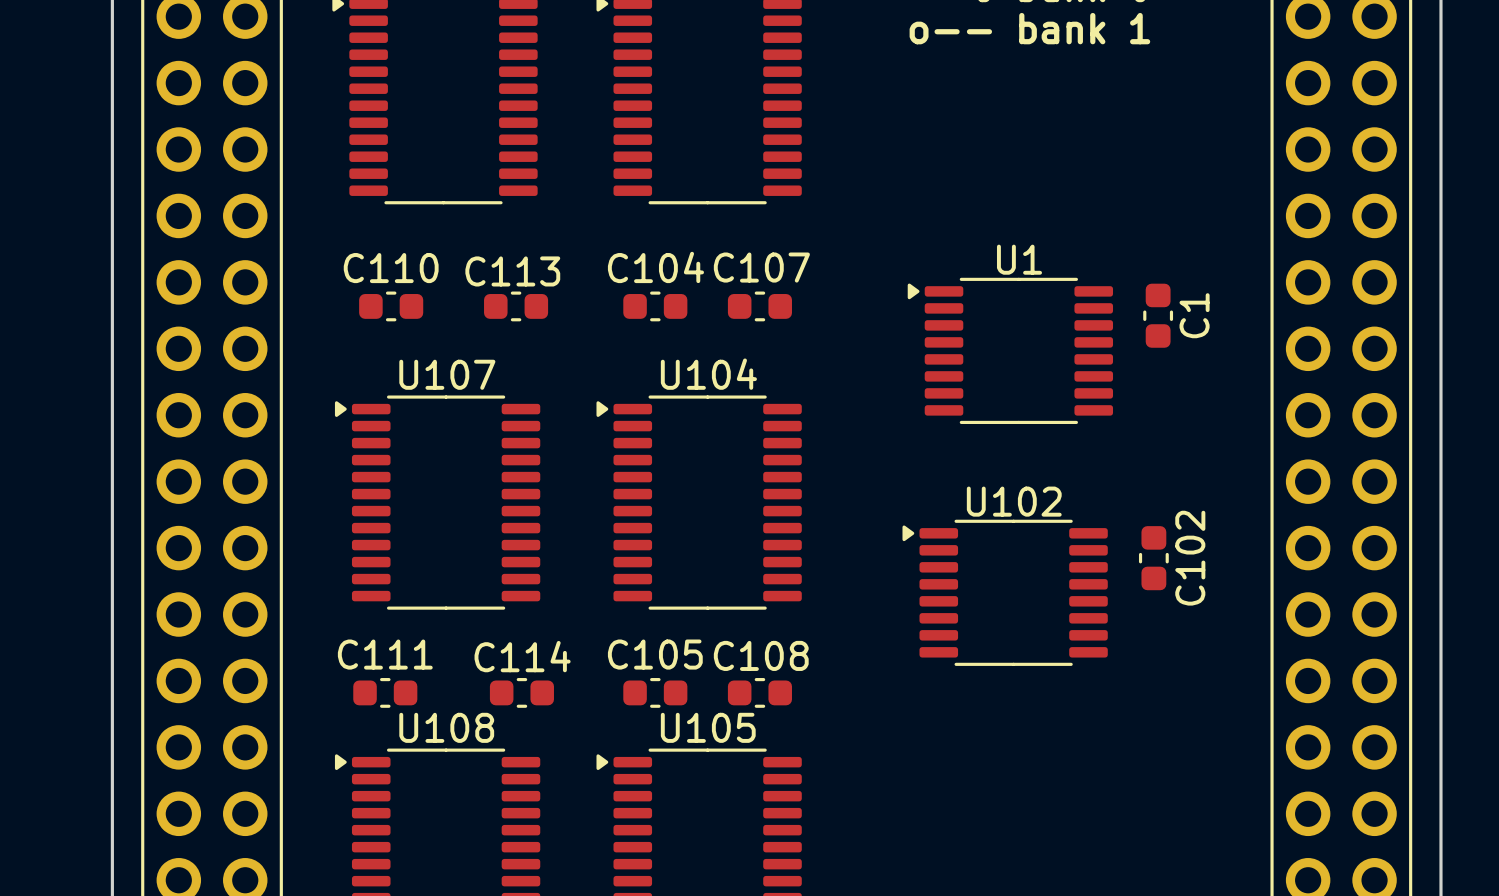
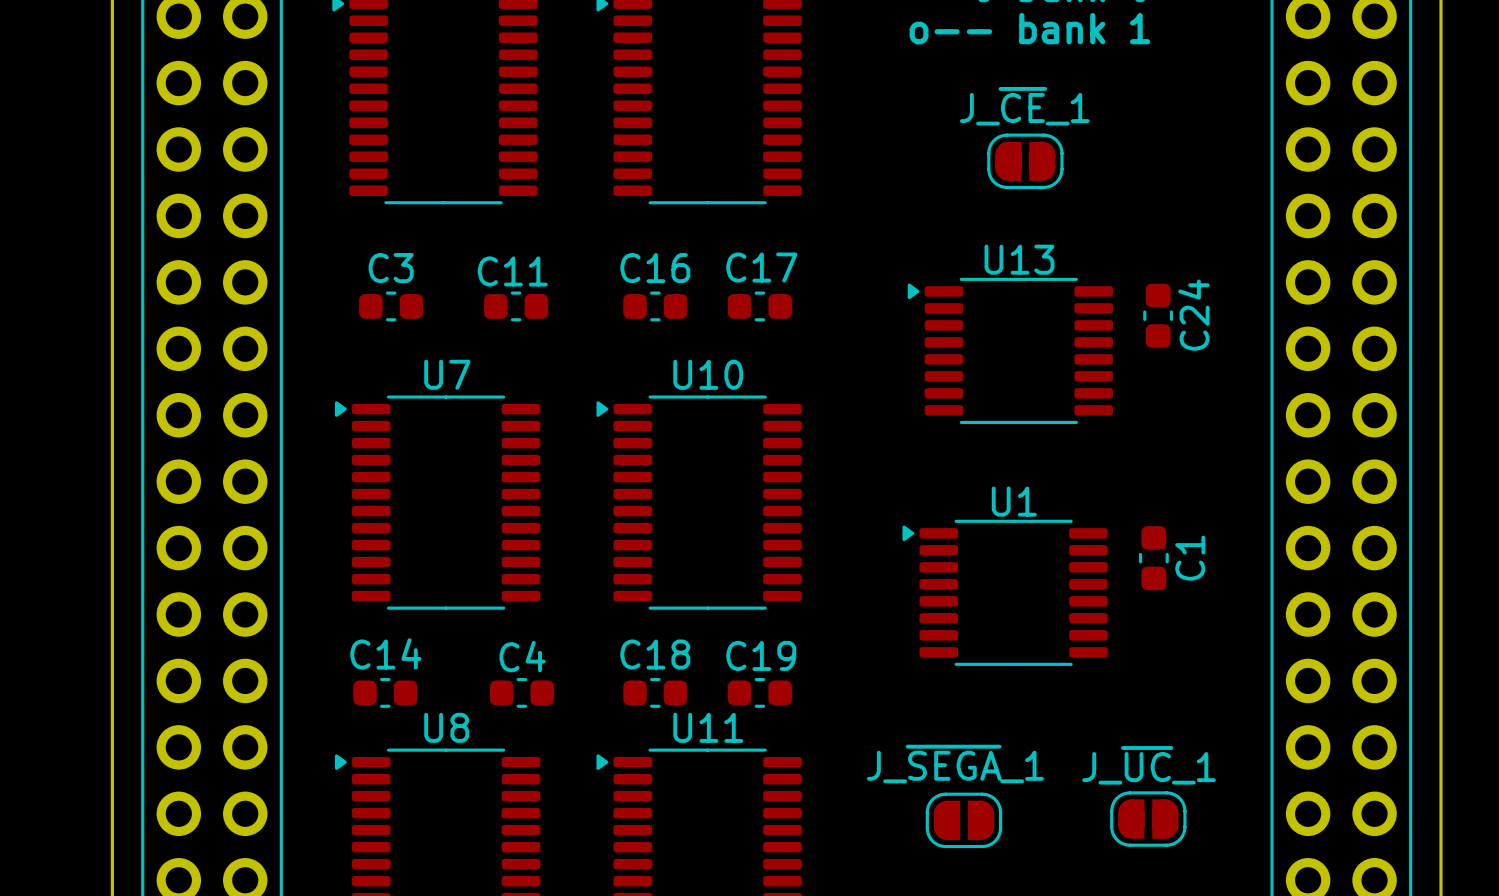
J_~{CE}_1: none -> (1025, 161)
U1 name: U1 (1019, 259) -> U13 (1019, 259)
C104 name: C104 (655, 267) -> C16 (655, 268)
C107 name: C107 (761, 267) -> C17 (761, 267)
C110 name: C110 (391, 268) -> C3 (391, 268)
C113 name: C113 (512, 271) -> C11 (512, 271)
C1 name: C1 (1194, 315) -> C24 (1193, 315)
U107 name: U107 (447, 374) -> U7 (447, 374)
U104 name: U104 (708, 374) -> U10 (708, 374)
U102 name: U102 (1014, 501) -> U1 (1014, 501)
C102 name: C102 (1190, 558) -> C1 (1190, 558)
C111 name: C111 (385, 654) -> C14 (385, 653)
C105 name: C105 (655, 654) -> C18 (655, 654)
C108 name: C108 (761, 655) -> C19 (761, 655)
C114 name: C114 (522, 656) -> C4 (522, 656)
U108 name: U108 (446, 727) -> U8 (446, 727)
U105 name: U105 (708, 727) -> U11 (708, 727)
J_~{UC}_1: none -> (1148, 819)
J_~{SEGA}_1: none -> (963, 820)

